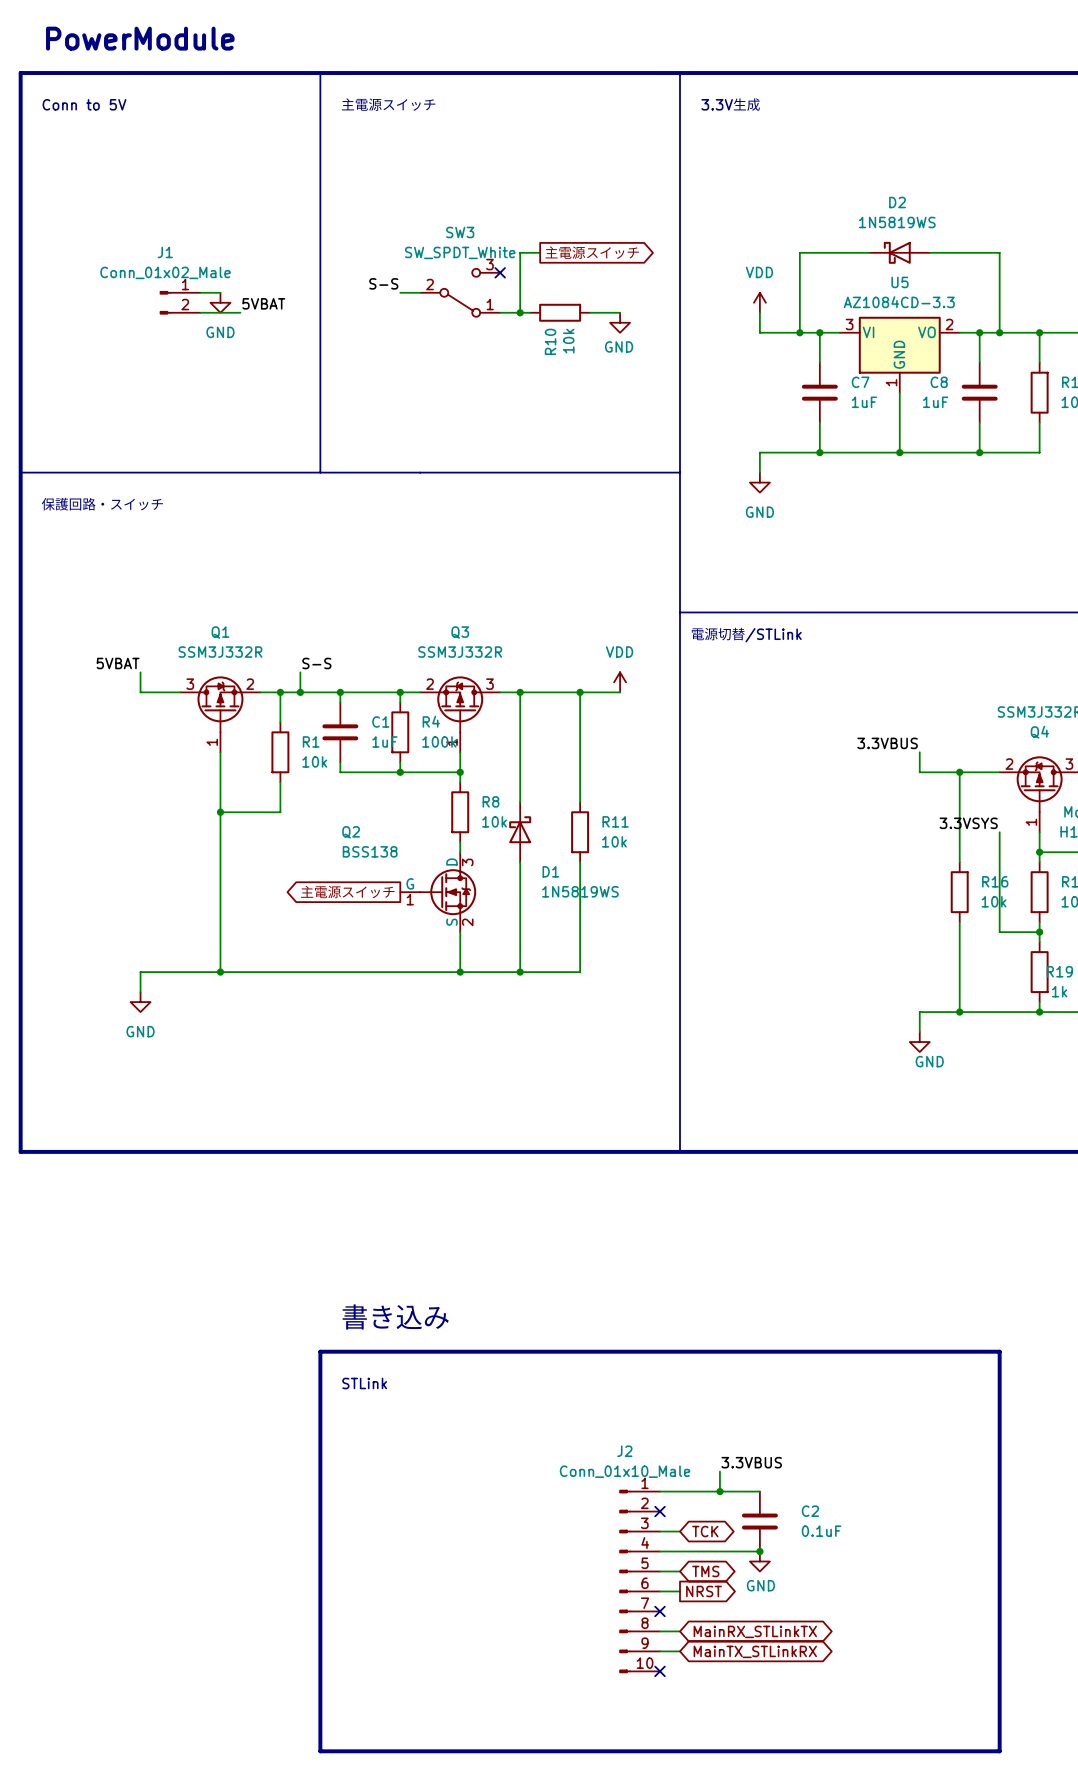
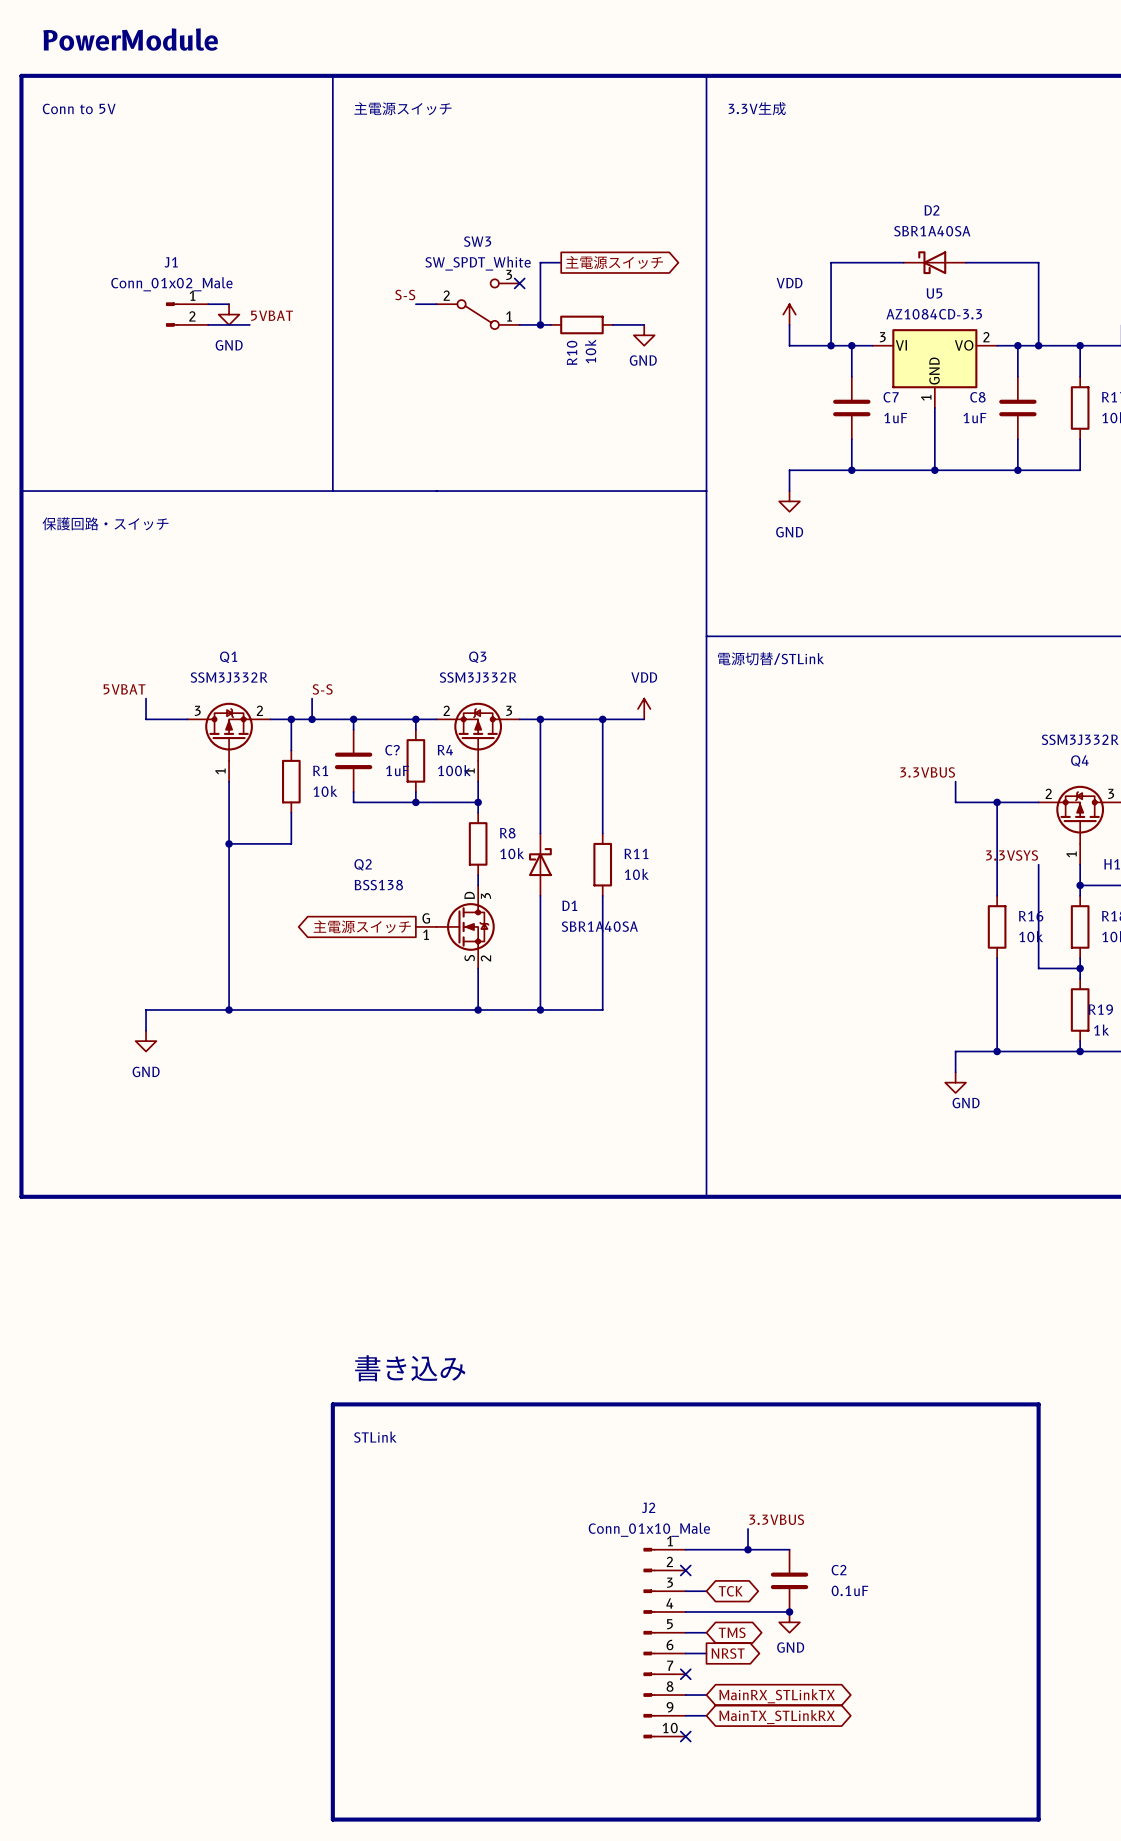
D2 value: 1N5819WS (897, 222) -> SBR1A40SA (932, 231)
C1 name: C1 (380, 721) -> C? (392, 750)
D1 value: 1N5819WS (580, 891) -> SBR1A40SA (599, 926)

